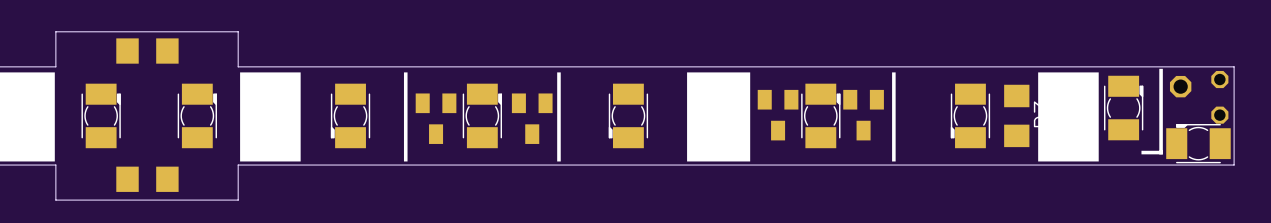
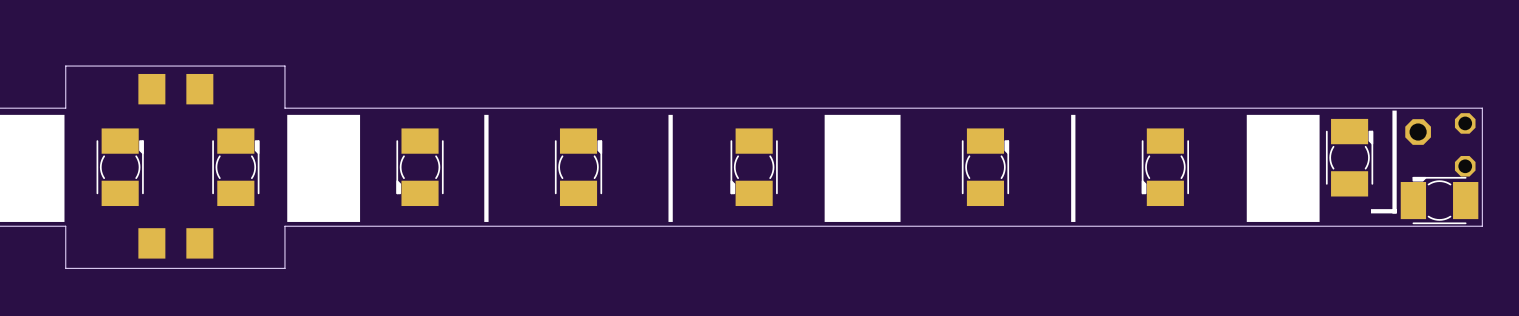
part: (778, 115) -> none
part: (863, 115) -> none
part: (1016, 115) -> none
part: (436, 118) -> none
part: (532, 118) -> none

